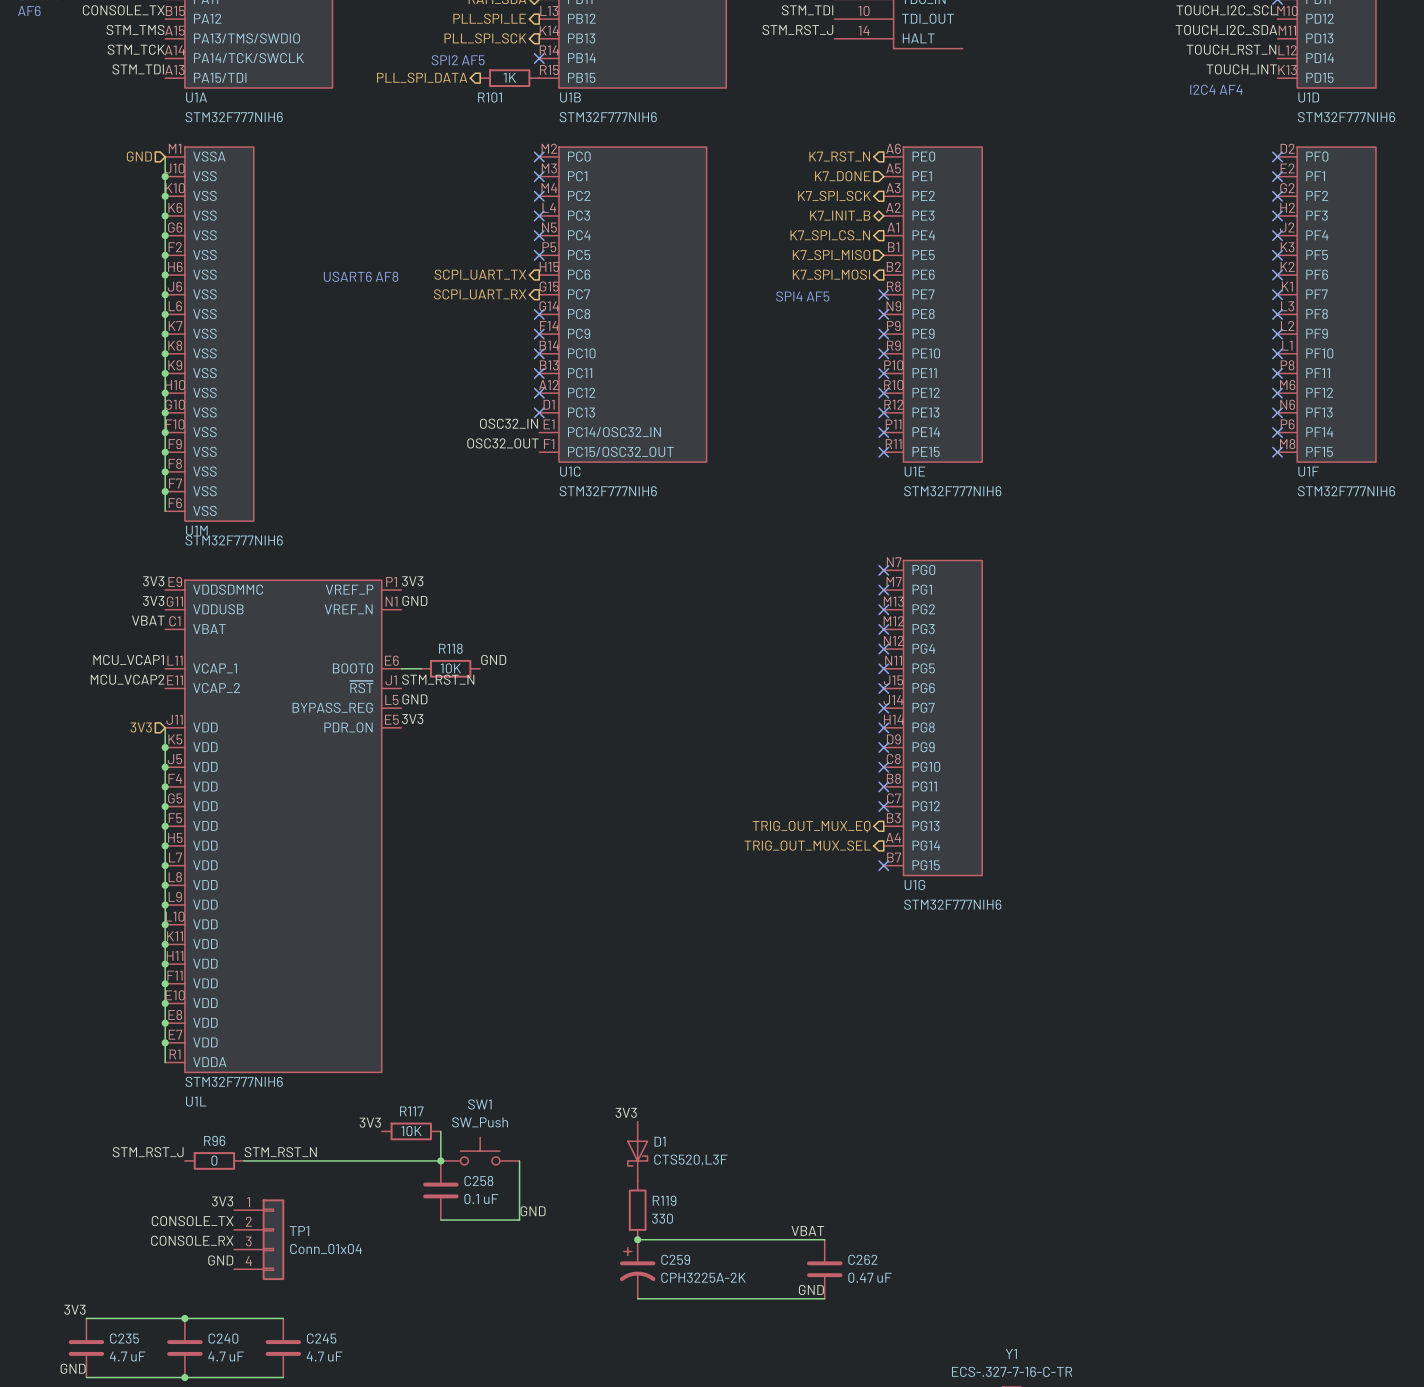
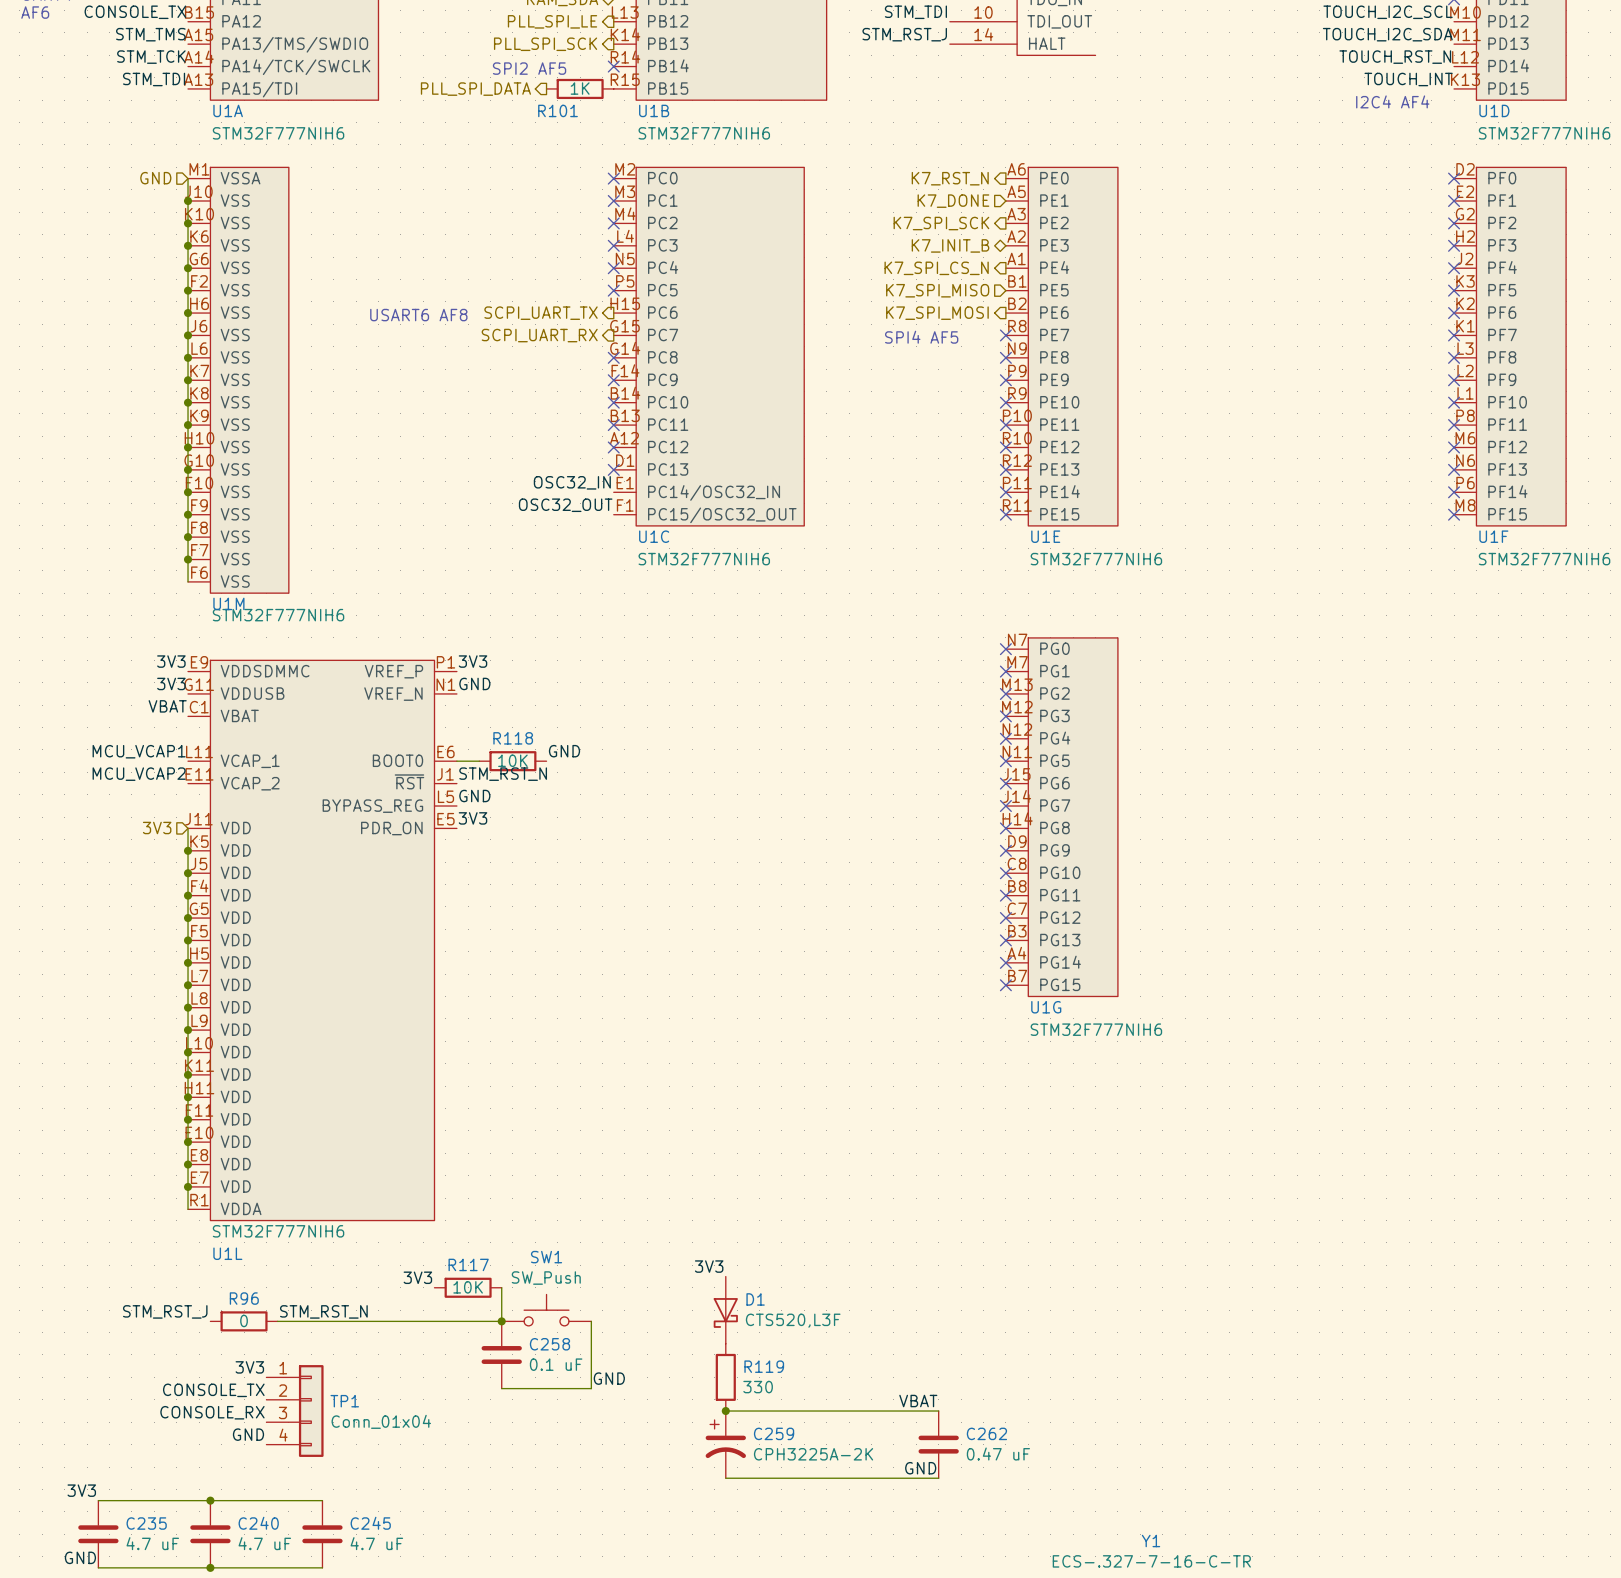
hierarchical label: TRIG_OUT_MUX_EQ (811, 826) -> none
no-connect mark: none -> (1005, 940)
hierarchical label: TRIG_OUT_MUX_SEL (807, 845) -> none
no-connect mark: none -> (1005, 962)

